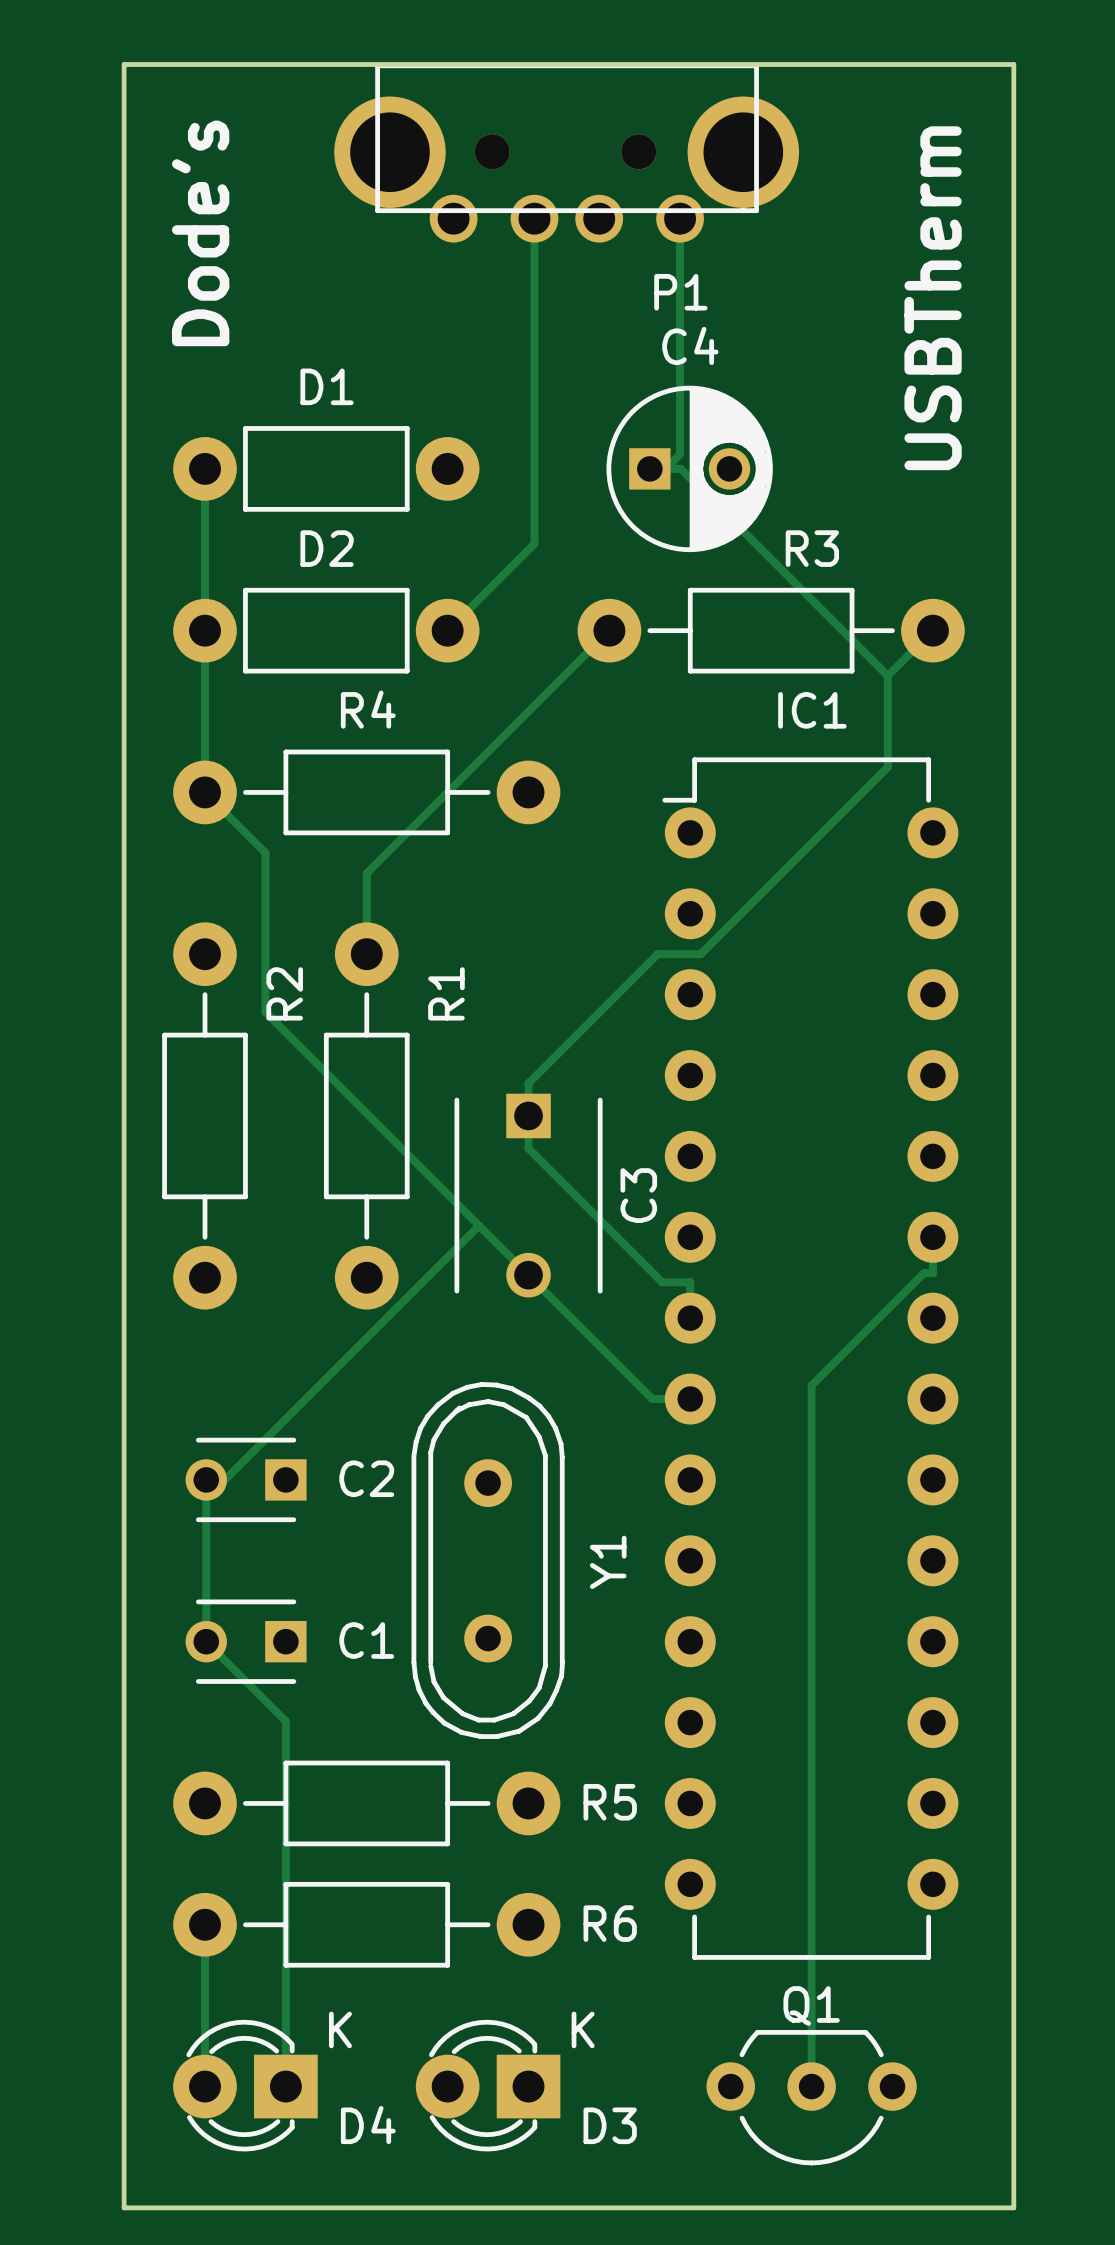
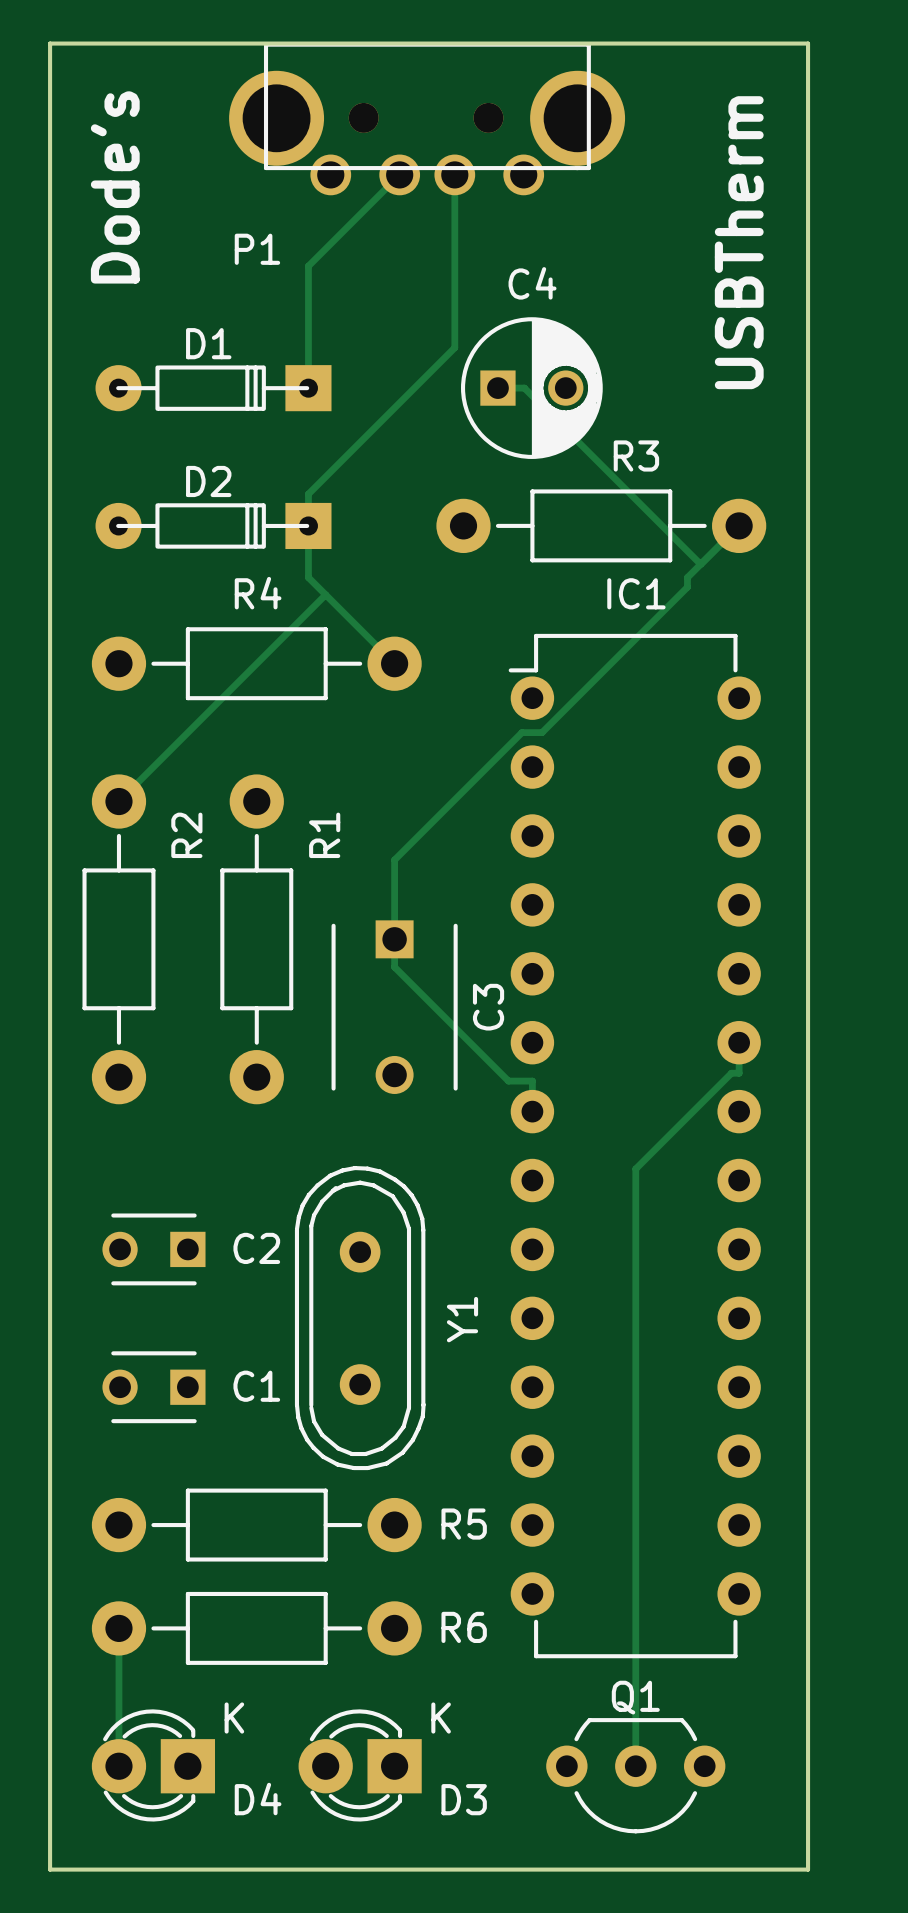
track: (534, 218) (534, 543) (447, 630) -> (399, 174) (308, 266) (308, 388)
track: none -> (454, 174) (454, 347) (308, 494) (308, 577) (394, 663)
track: (680, 218) (680, 454) (665, 468) -> none
P1 name position: P1 (680, 292) -> P1 (257, 249)
D1 footprint: [173, 426, 480, 512] -> [95, 365, 332, 412]
track: (205, 468) (205, 792) (265, 852) (265, 1012) (652, 1399) (690, 1399) -> none
D2 footprint: [173, 587, 480, 674] -> [95, 502, 332, 550]
track: (609, 630) (366, 873) (366, 954) -> none
track: (887, 675) (887, 767) (700, 954) (657, 954) (528, 1083) -> (739, 525) (687, 577) (687, 587) (542, 732) (521, 732) (394, 859) (394, 911)
track: none -> (325, 594) (118, 801)
track: (479, 1225) (224, 1479) (206, 1479) (206, 1641) (285, 1721) (285, 2086) -> none

